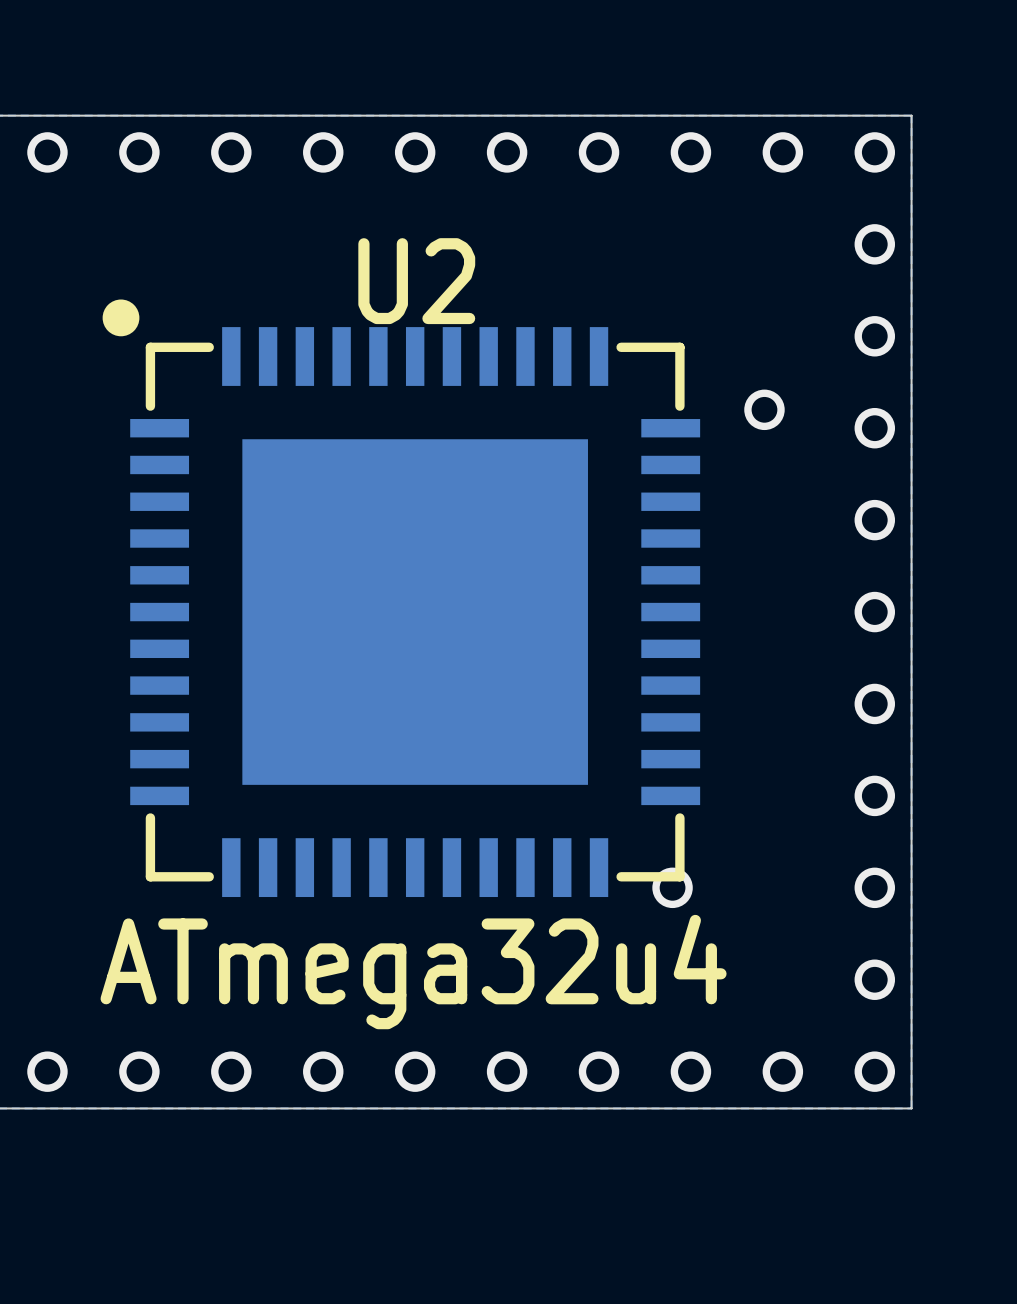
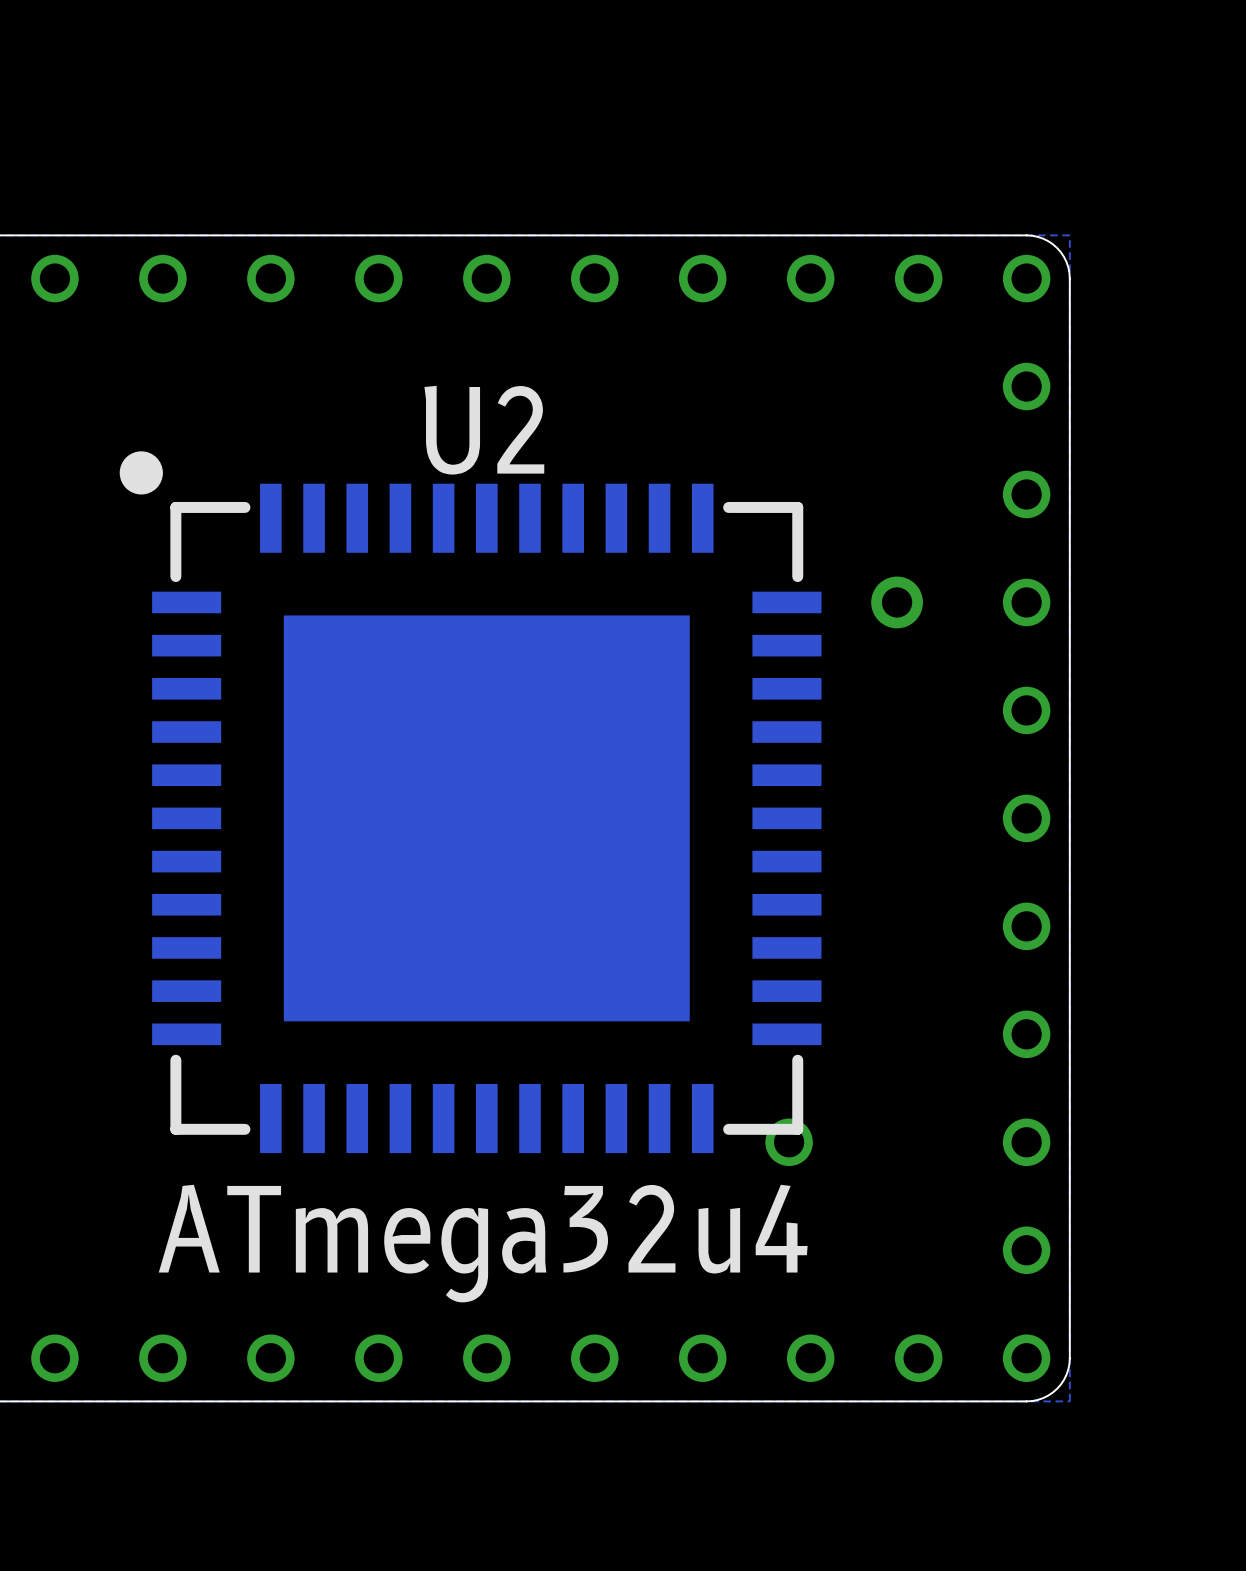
board edge: (874, 115) (911, 115) (911, 152) -> (1026, 235) (1043, 238) (1057, 248) (1066, 262) (1069, 278)
via position: (764, 409) -> (897, 602)
board edge: (911, 1071) (911, 1108) (874, 1108) -> (1069, 1358) (1066, 1374) (1057, 1388) (1043, 1398) (1026, 1401)

